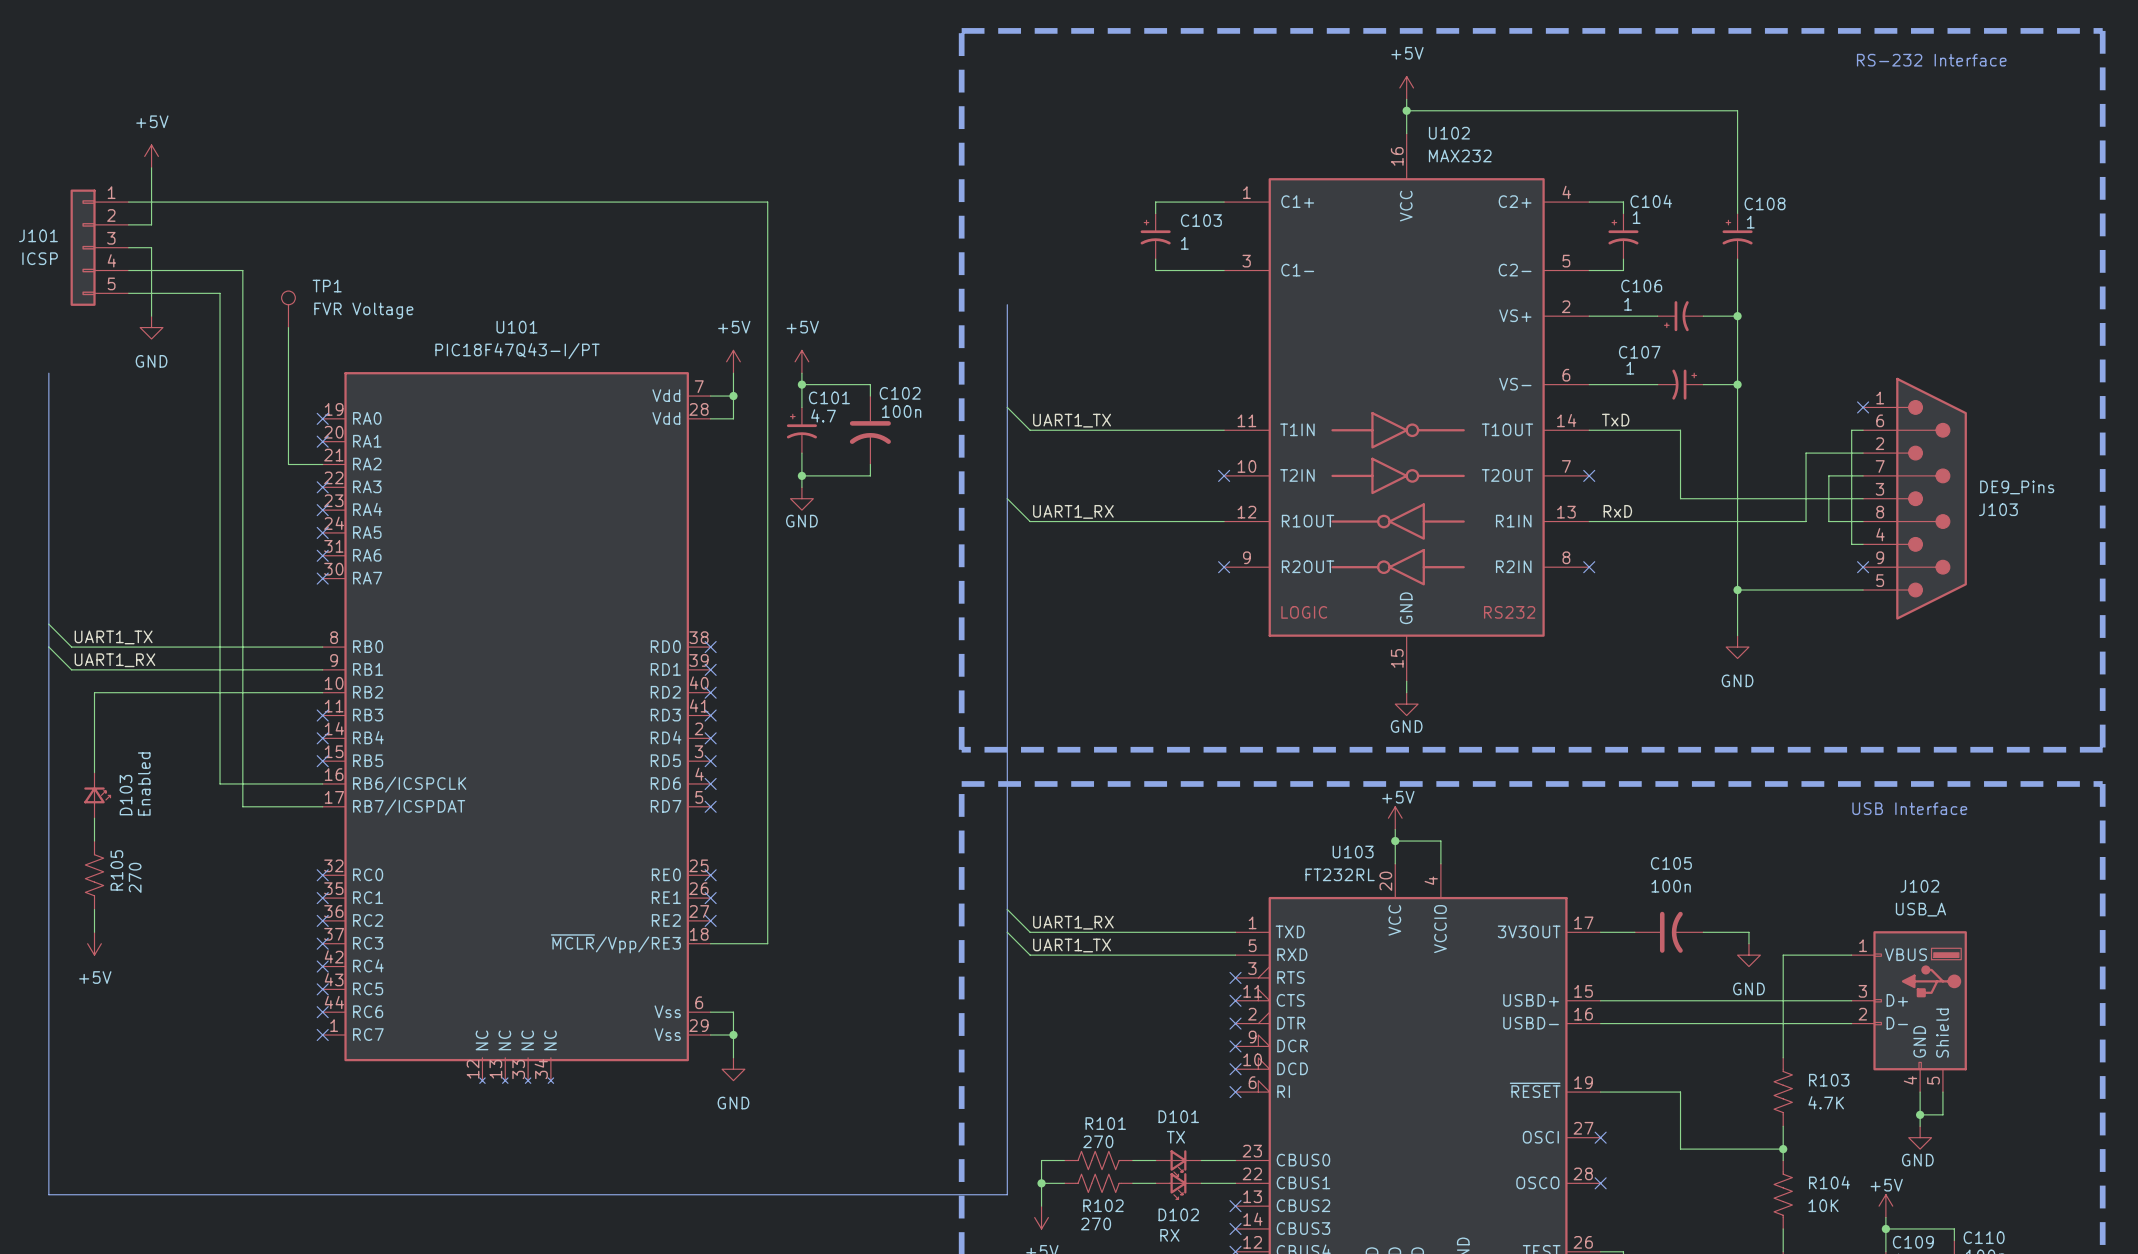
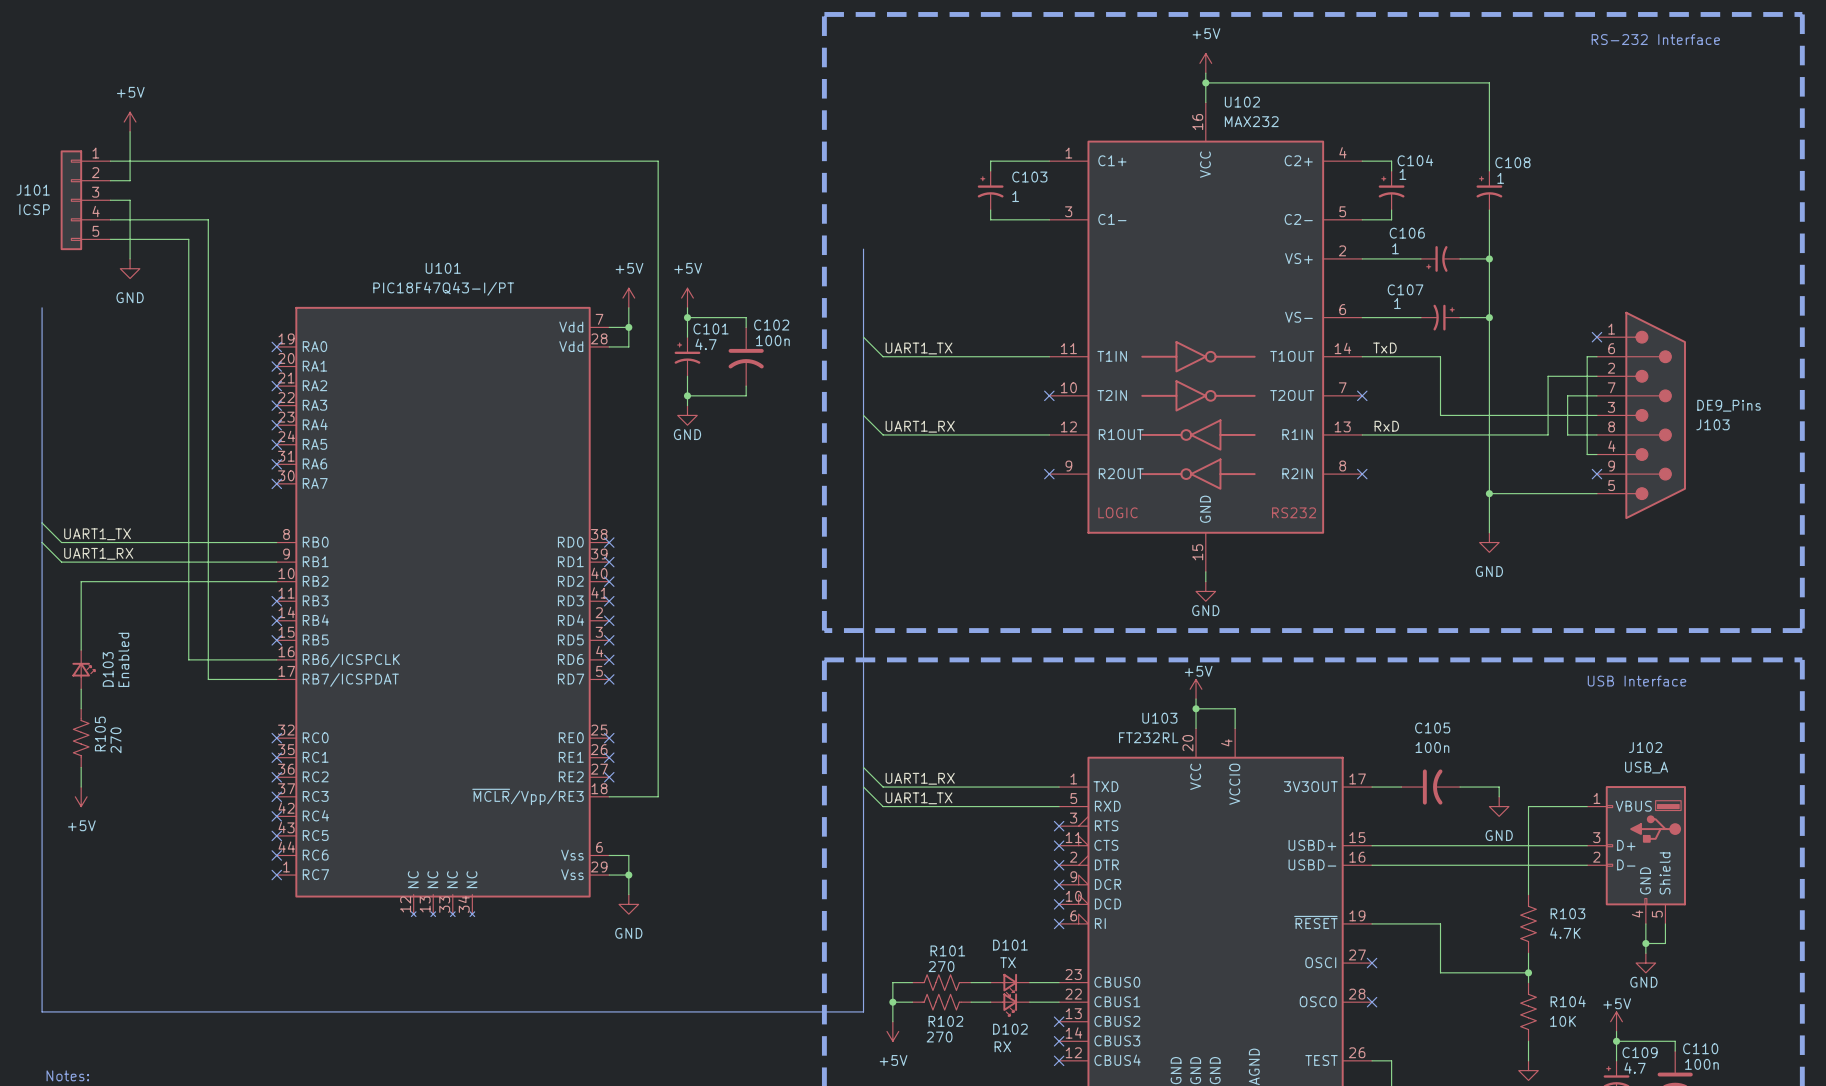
TP1: FVR Voltage (288, 309) -> none
wire: (288, 327) (288, 464) (322, 464) -> none
no-connect mark: none -> (276, 386)

